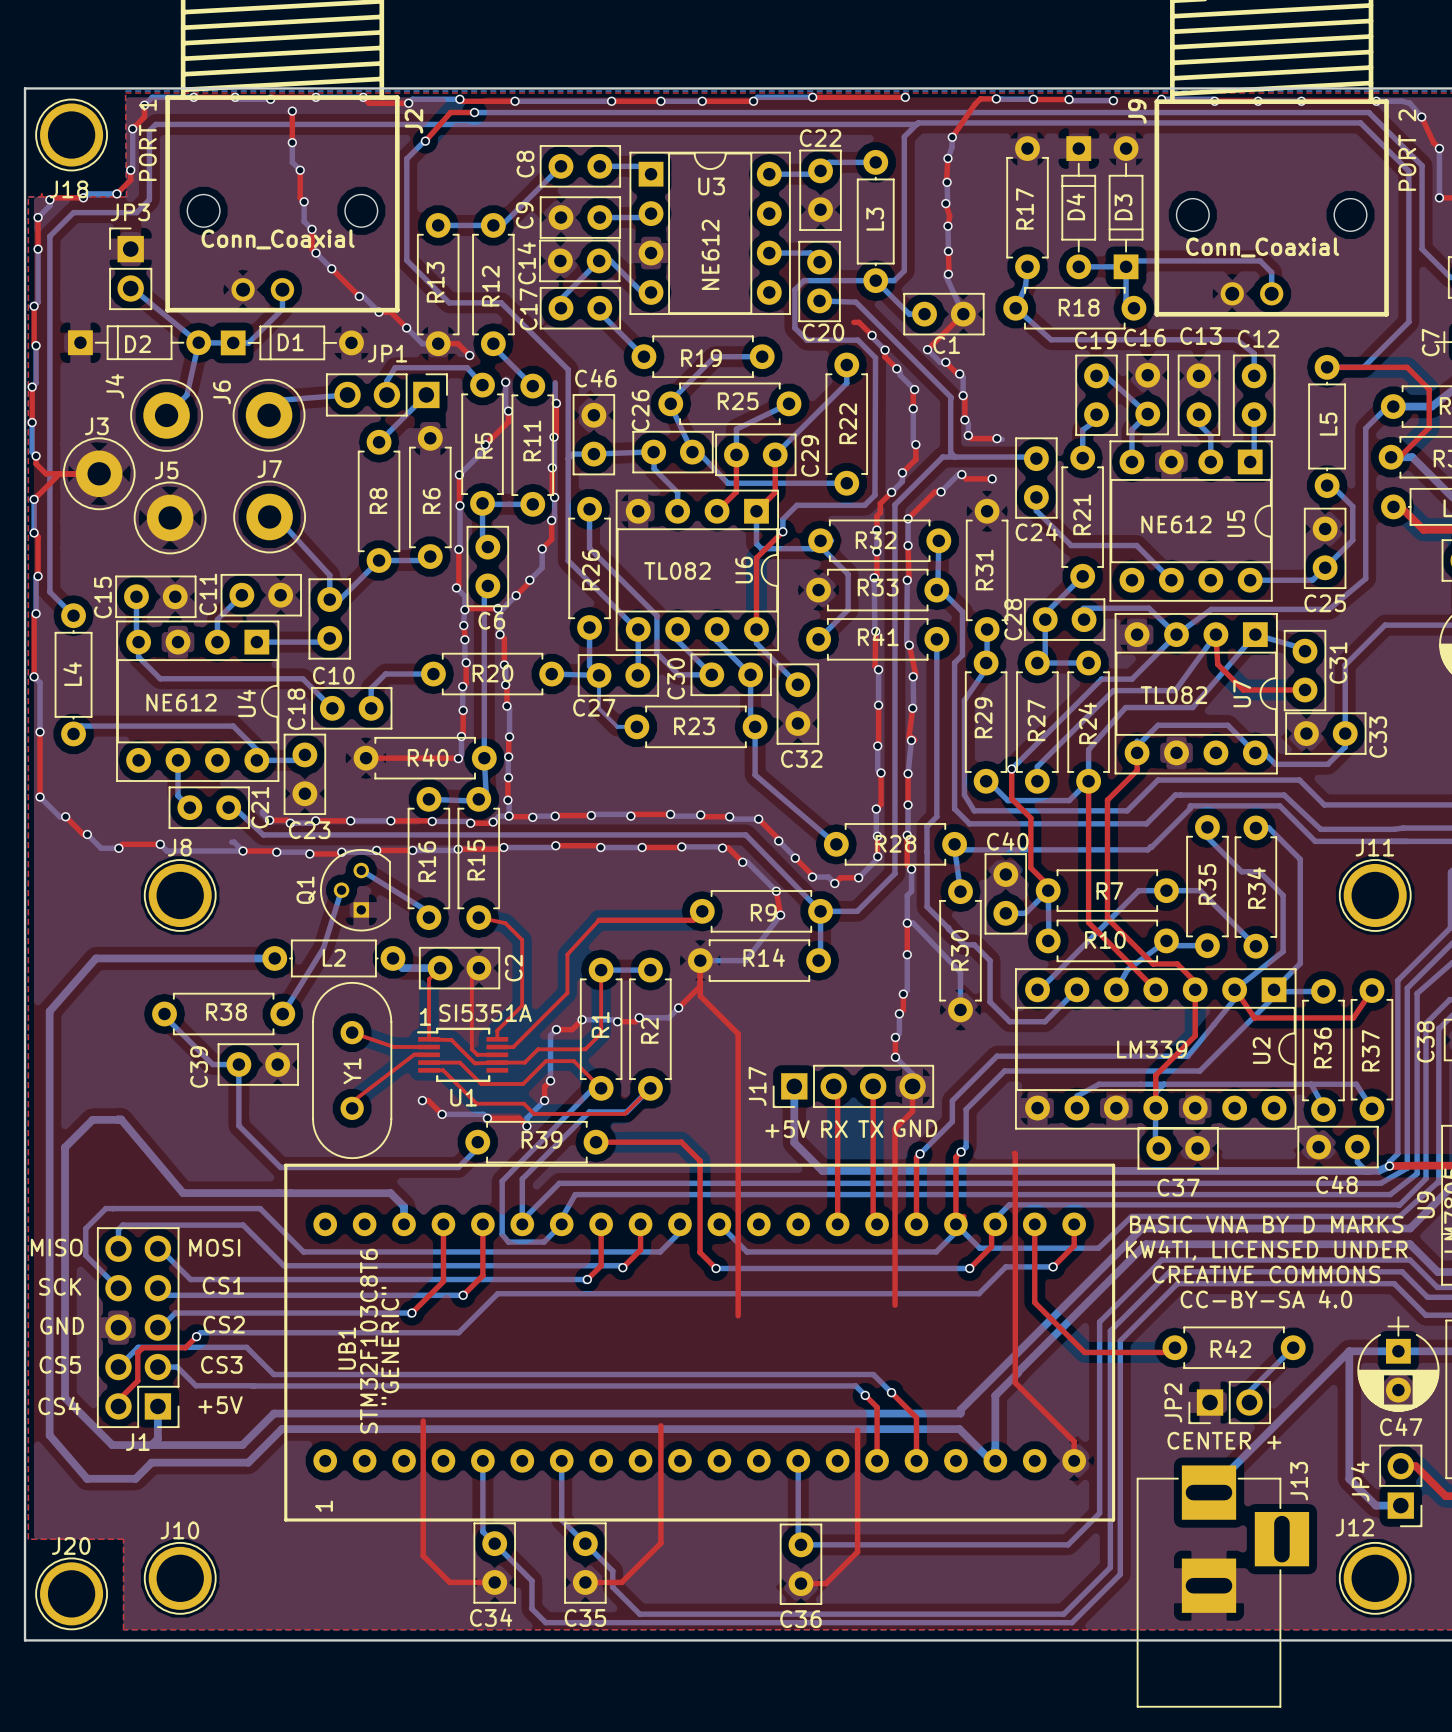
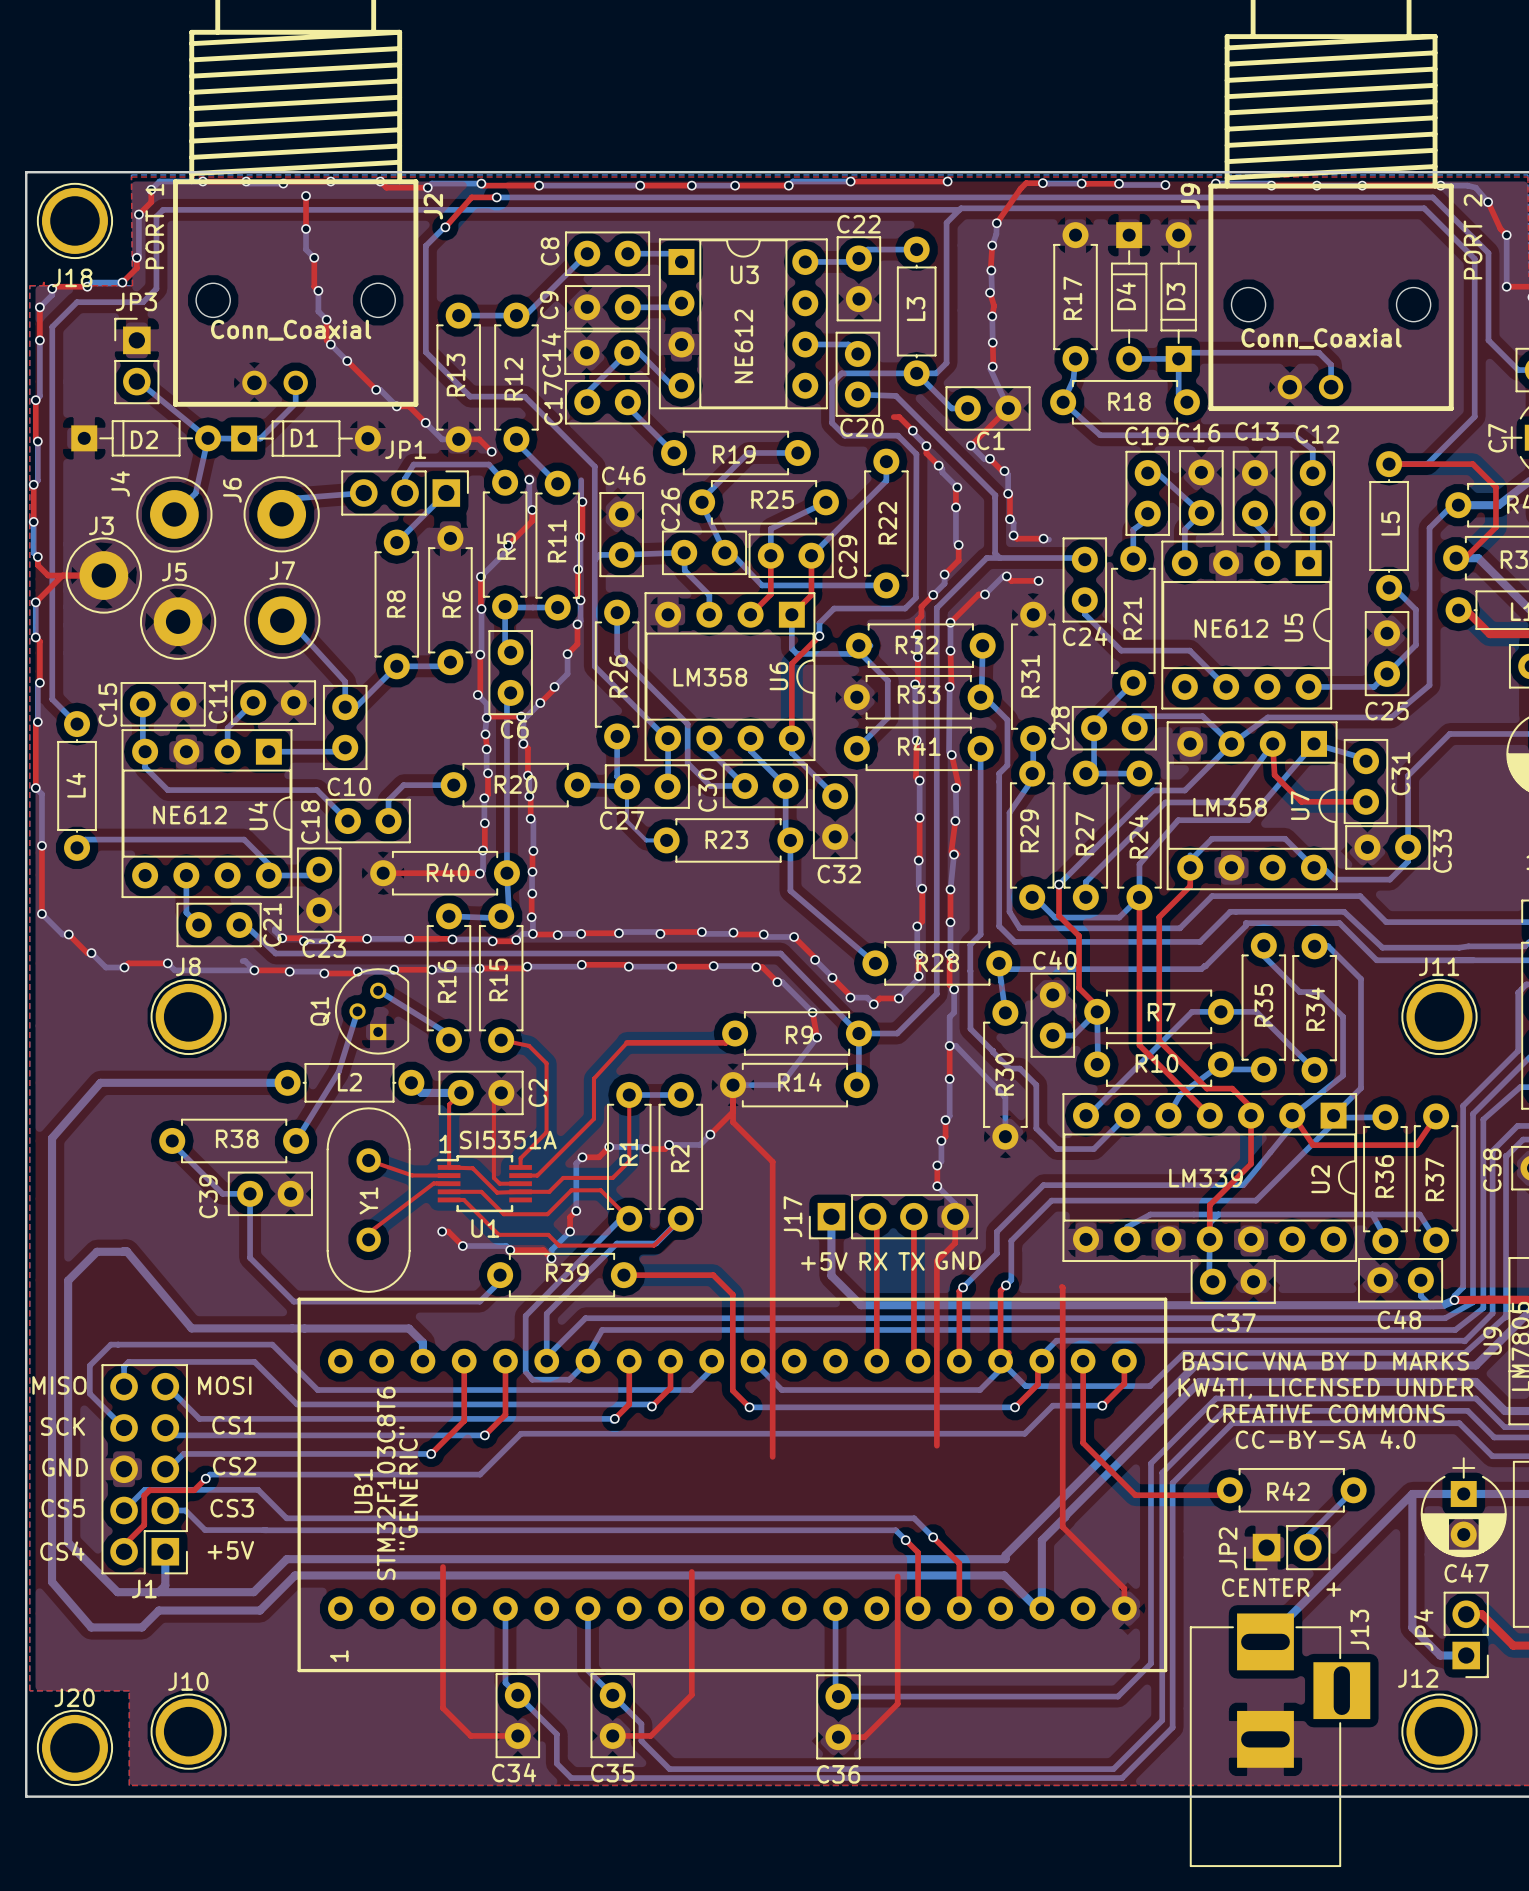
text: TL082 (677, 570) -> LM358 (710, 677)
text: TL082 (1174, 695) -> LM358 (1230, 807)

